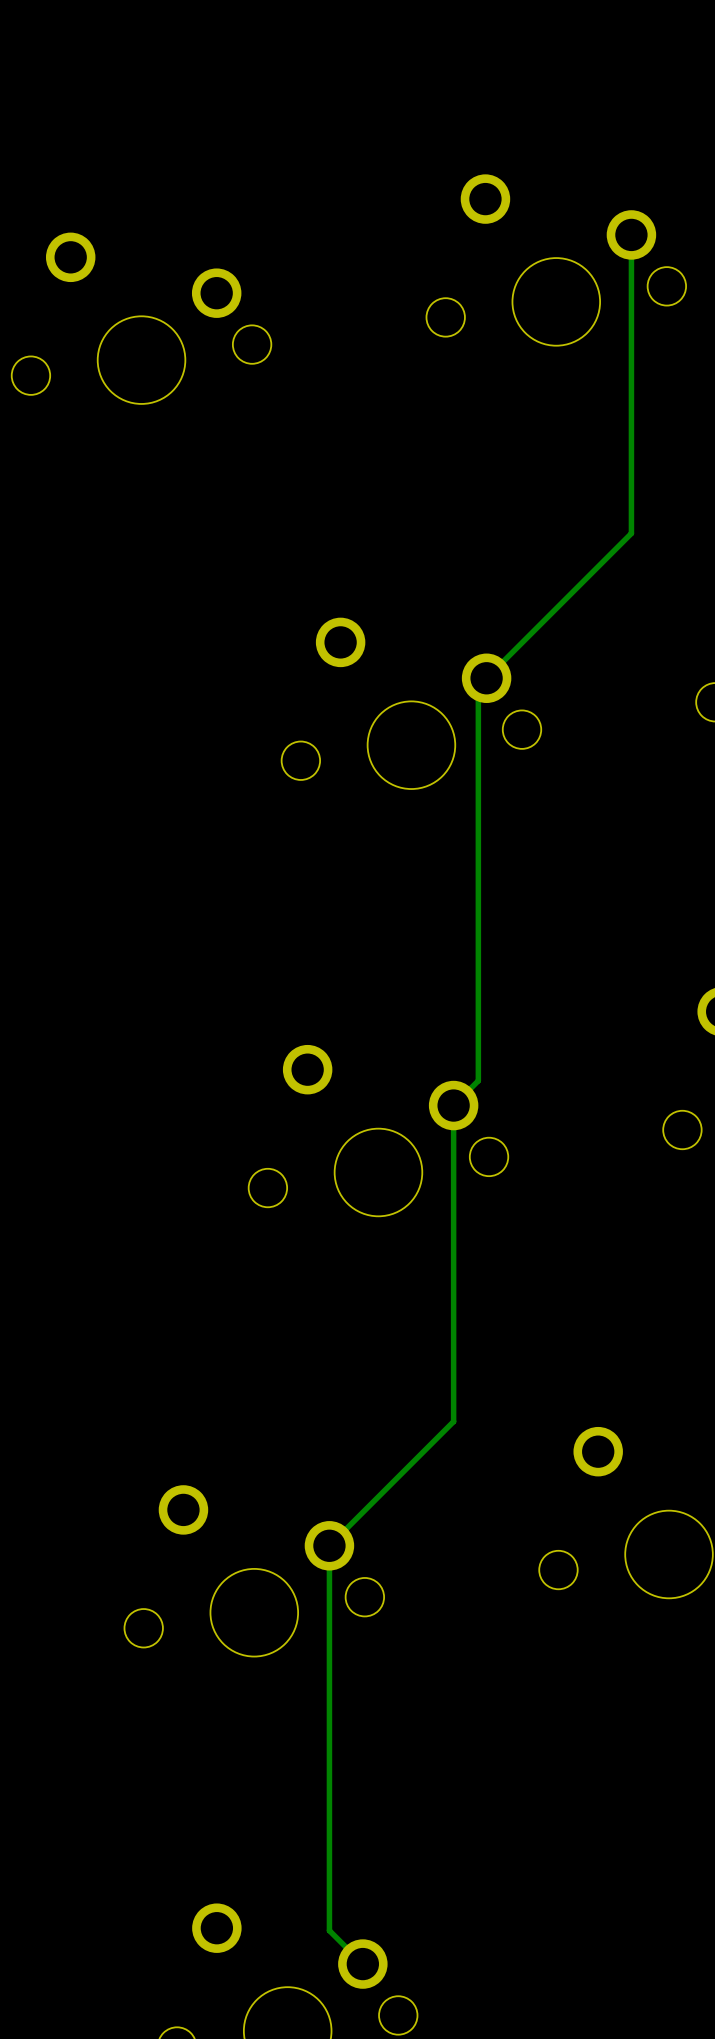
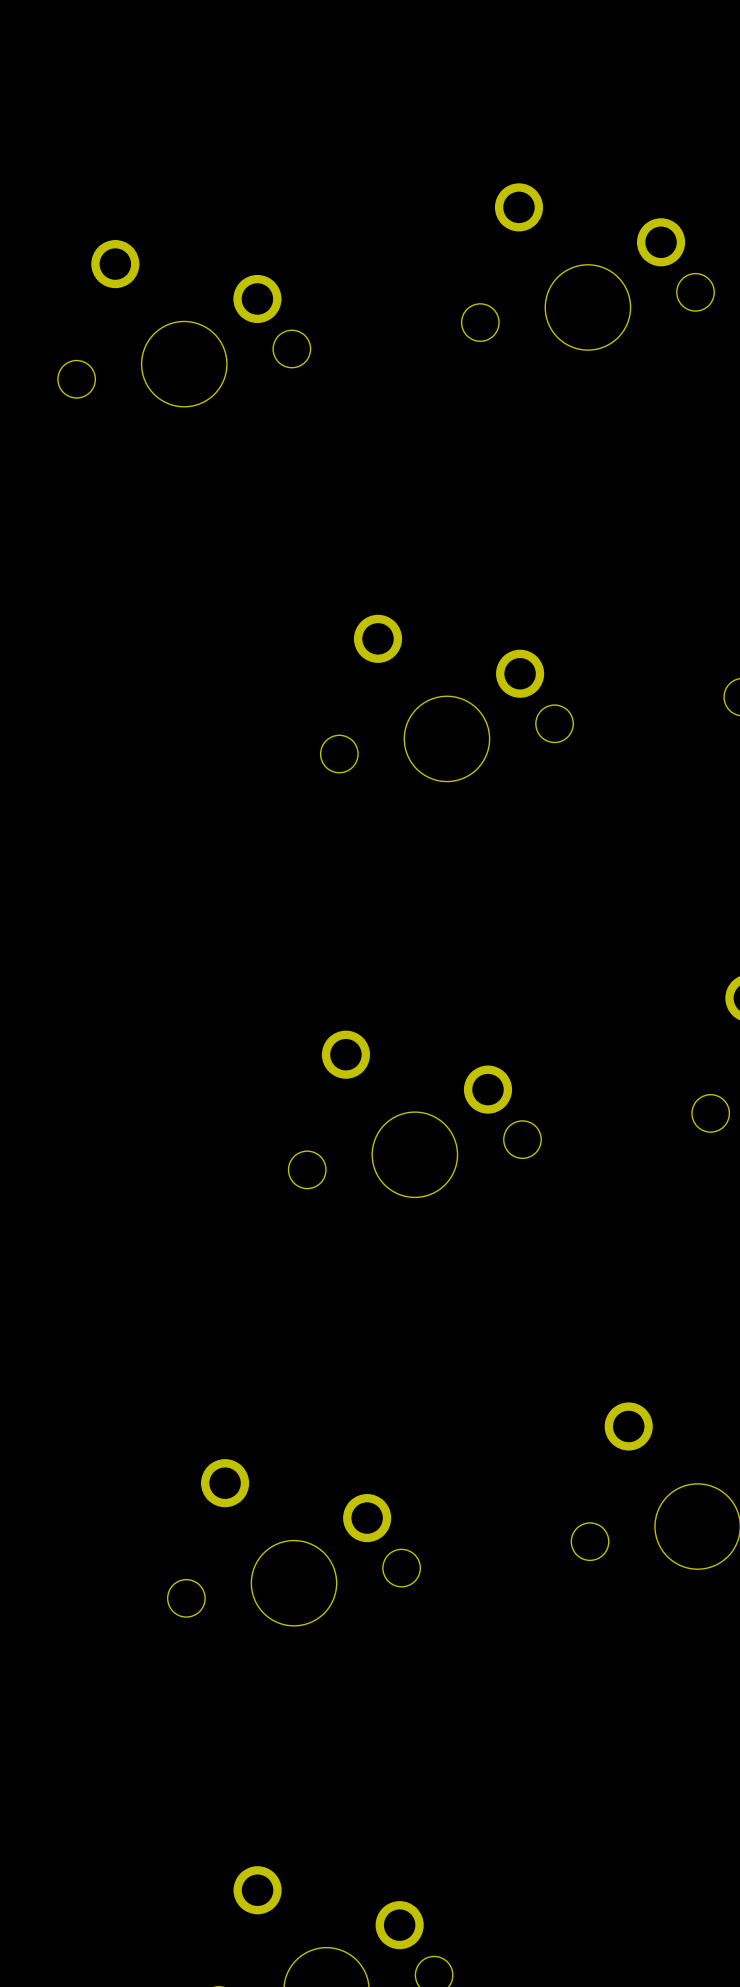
track: (631, 234) (631, 533) (478, 686) (478, 1080) (453, 1105) (453, 1421) (329, 1545) (329, 1930) (362, 1964) -> none

